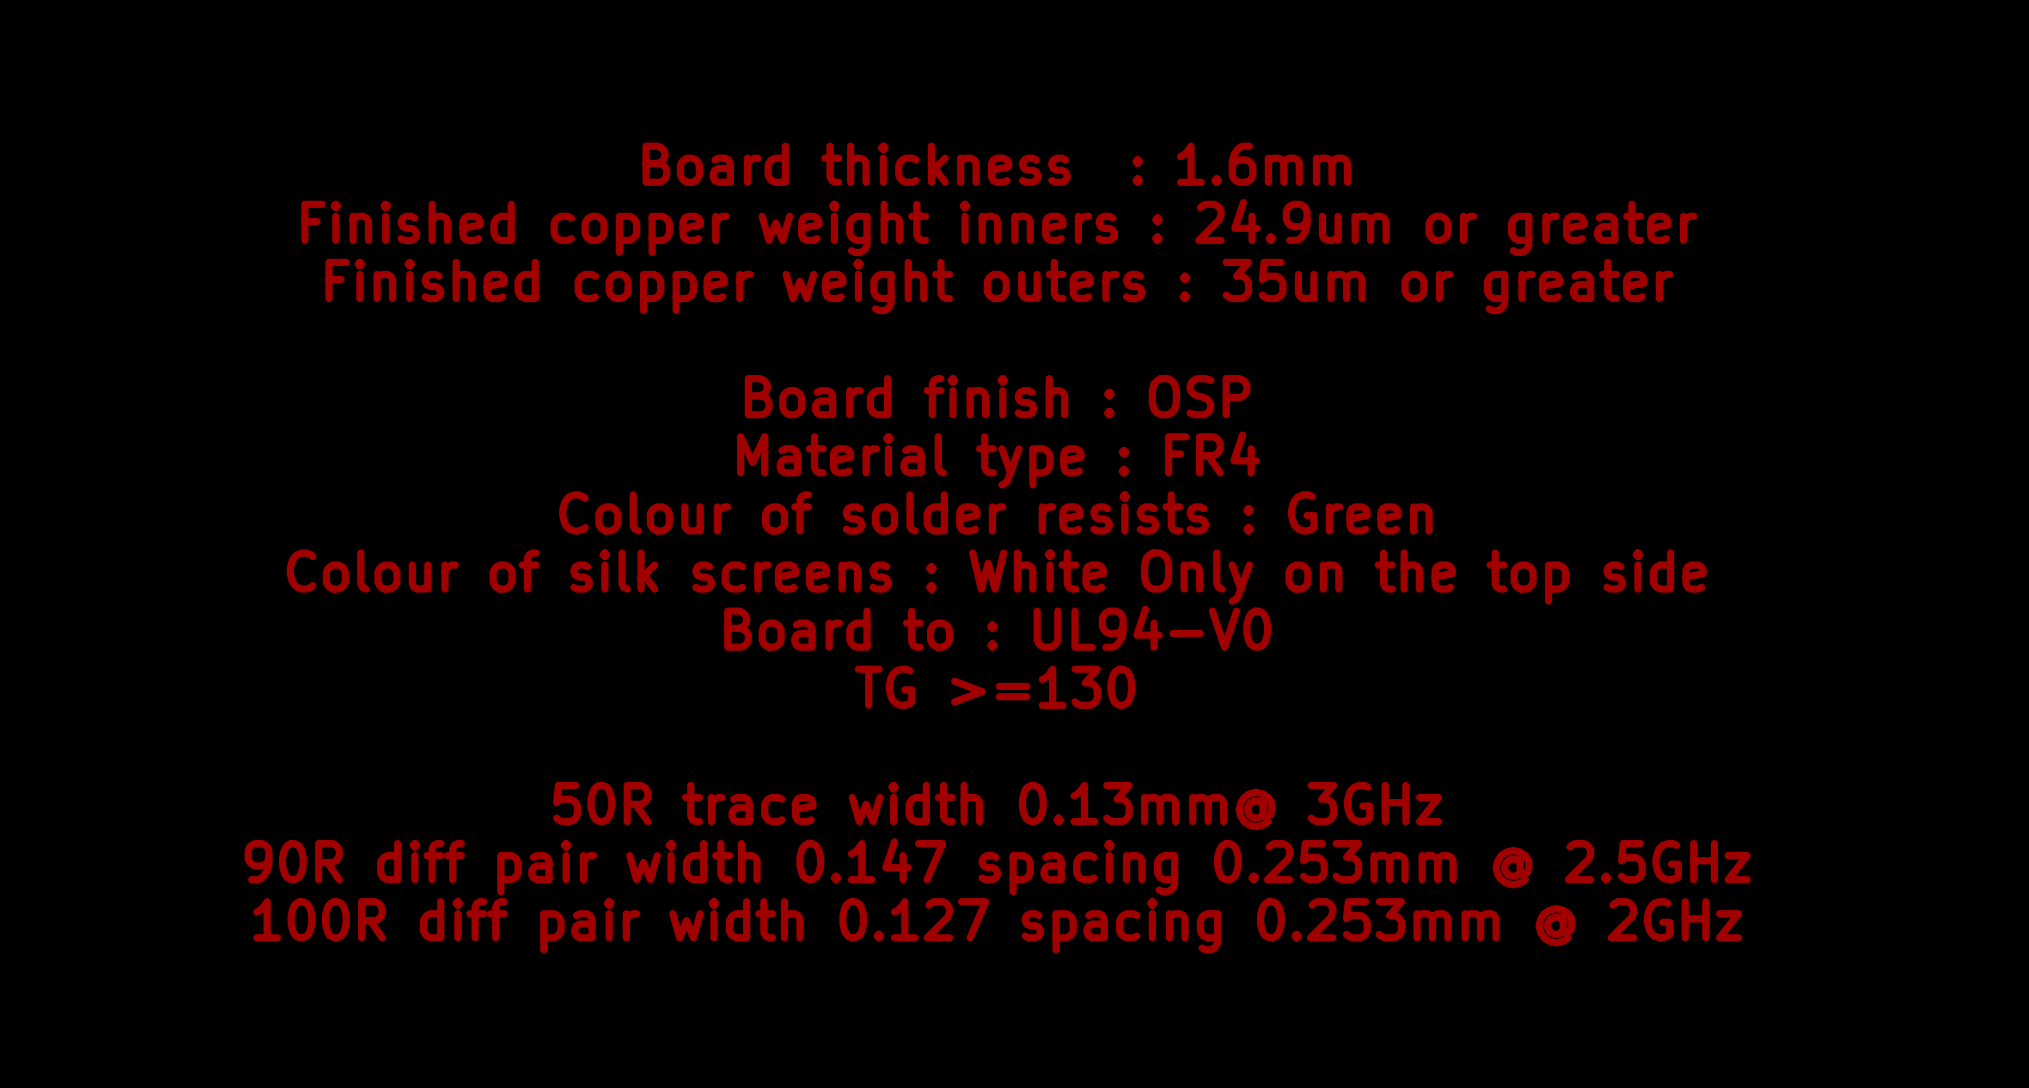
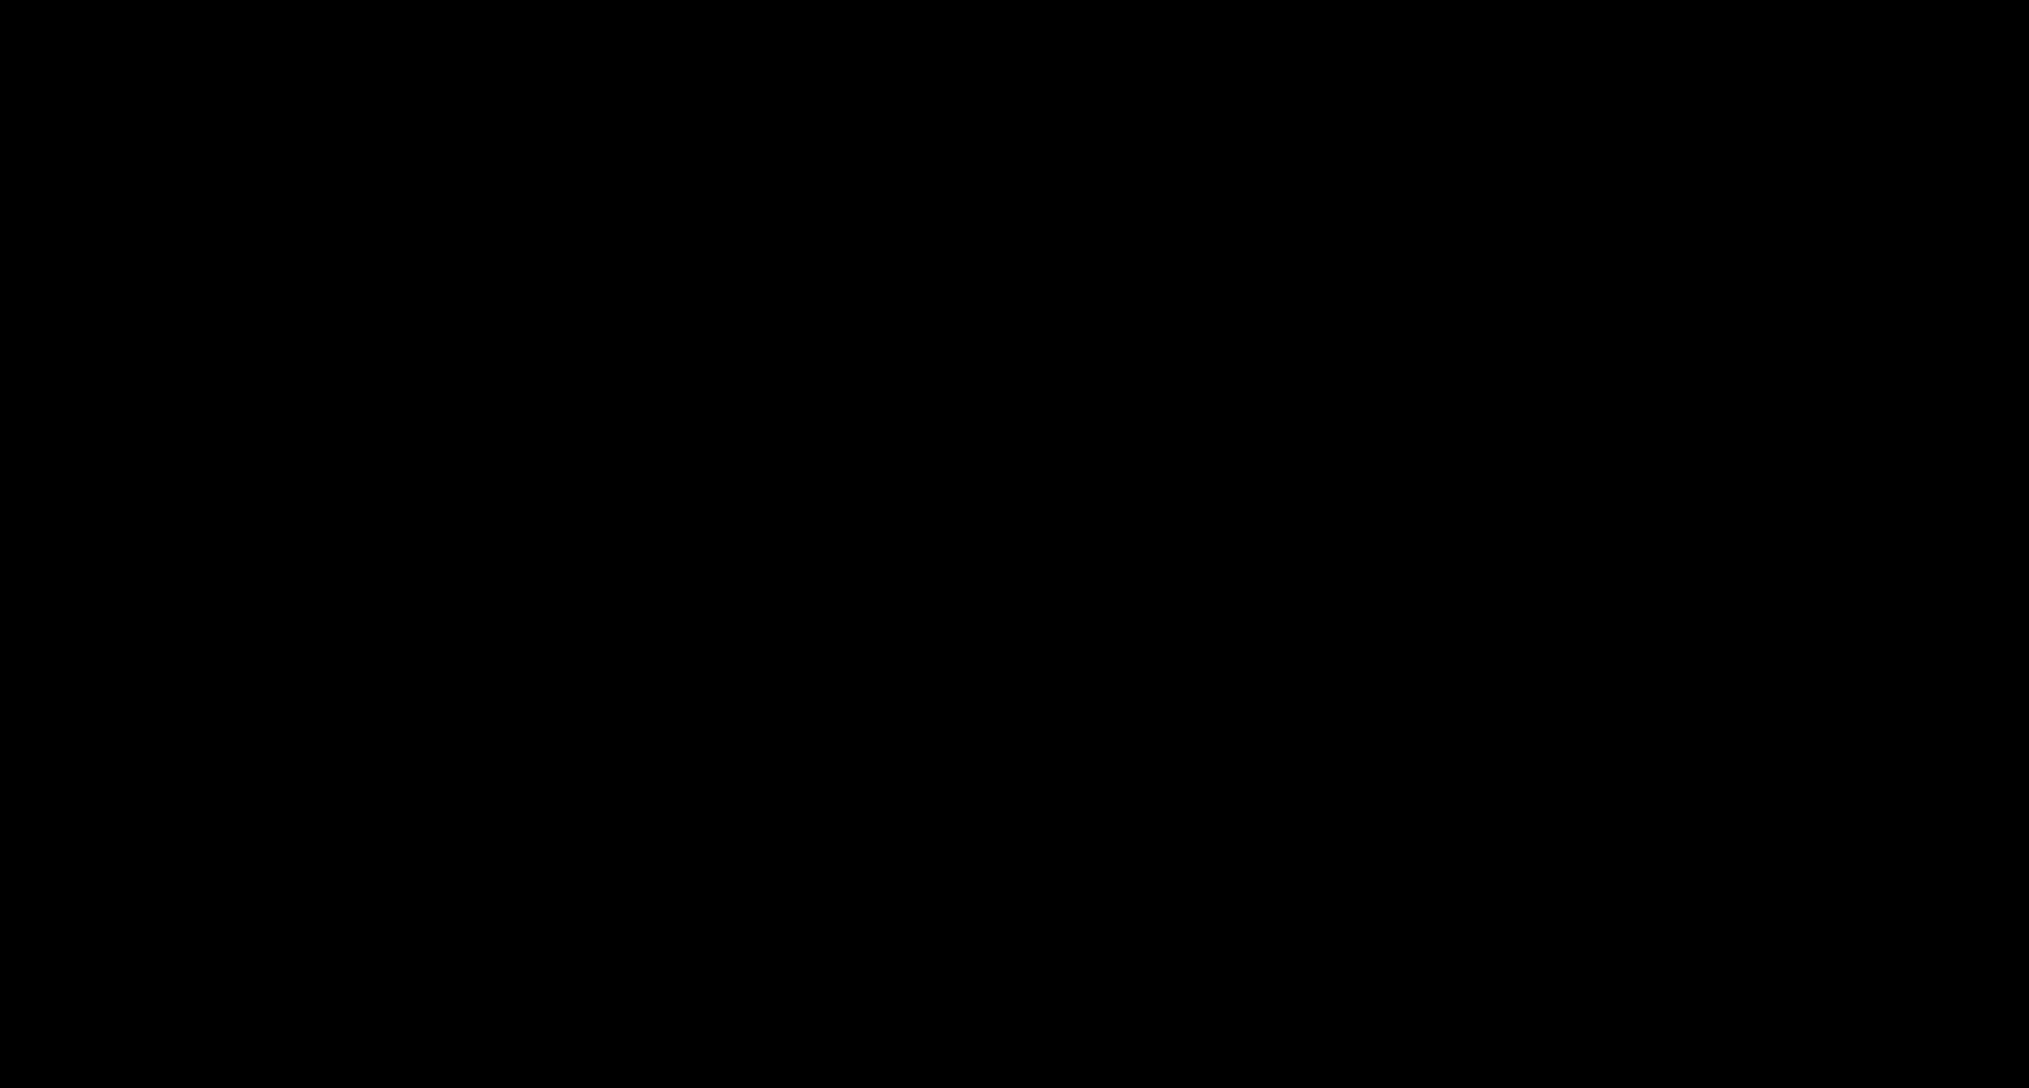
text: Board thickness : 1.6mm (996, 164) -> none
text: Finished copper weight inners : 24.9um or greater (999, 227) -> none
text: Finished copper weight outers : 35um or greater (999, 286) -> none
text: Board finish : OSP (997, 396) -> none
text: Material type : FR4 (998, 459) -> none
text: Colour of solder resists : Green (995, 512) -> none
text: Colour of silk screens : White Only on the top side (996, 577) -> none
text: Board to : UL94-V0 (997, 628) -> none
text: TG >=130 (995, 687) -> none
text: 50R trace width 0.13mm@ 3GHz (997, 806) -> none
text: 90R diff pair width 0.147 spacing 0.253mm @ 2.5GHz (997, 866) -> none
text: 100R diff pair width 0.127 spacing 0.253mm @ 2GHz (997, 925) -> none

